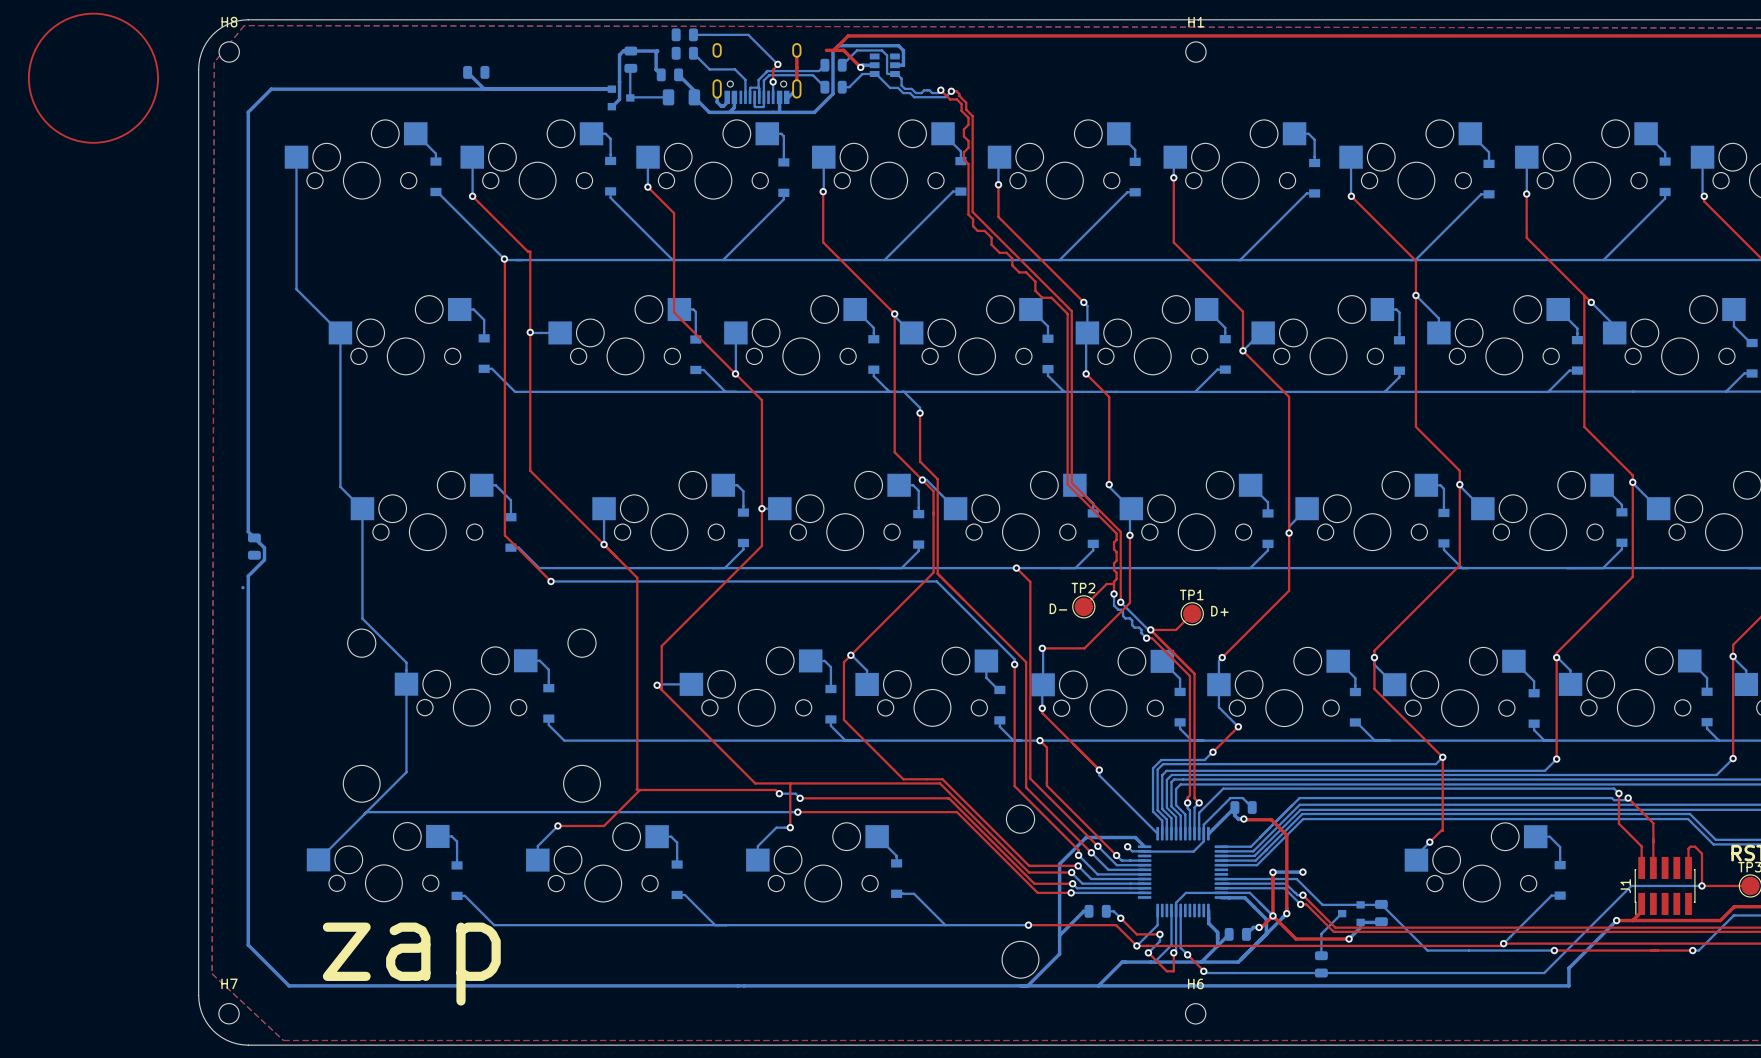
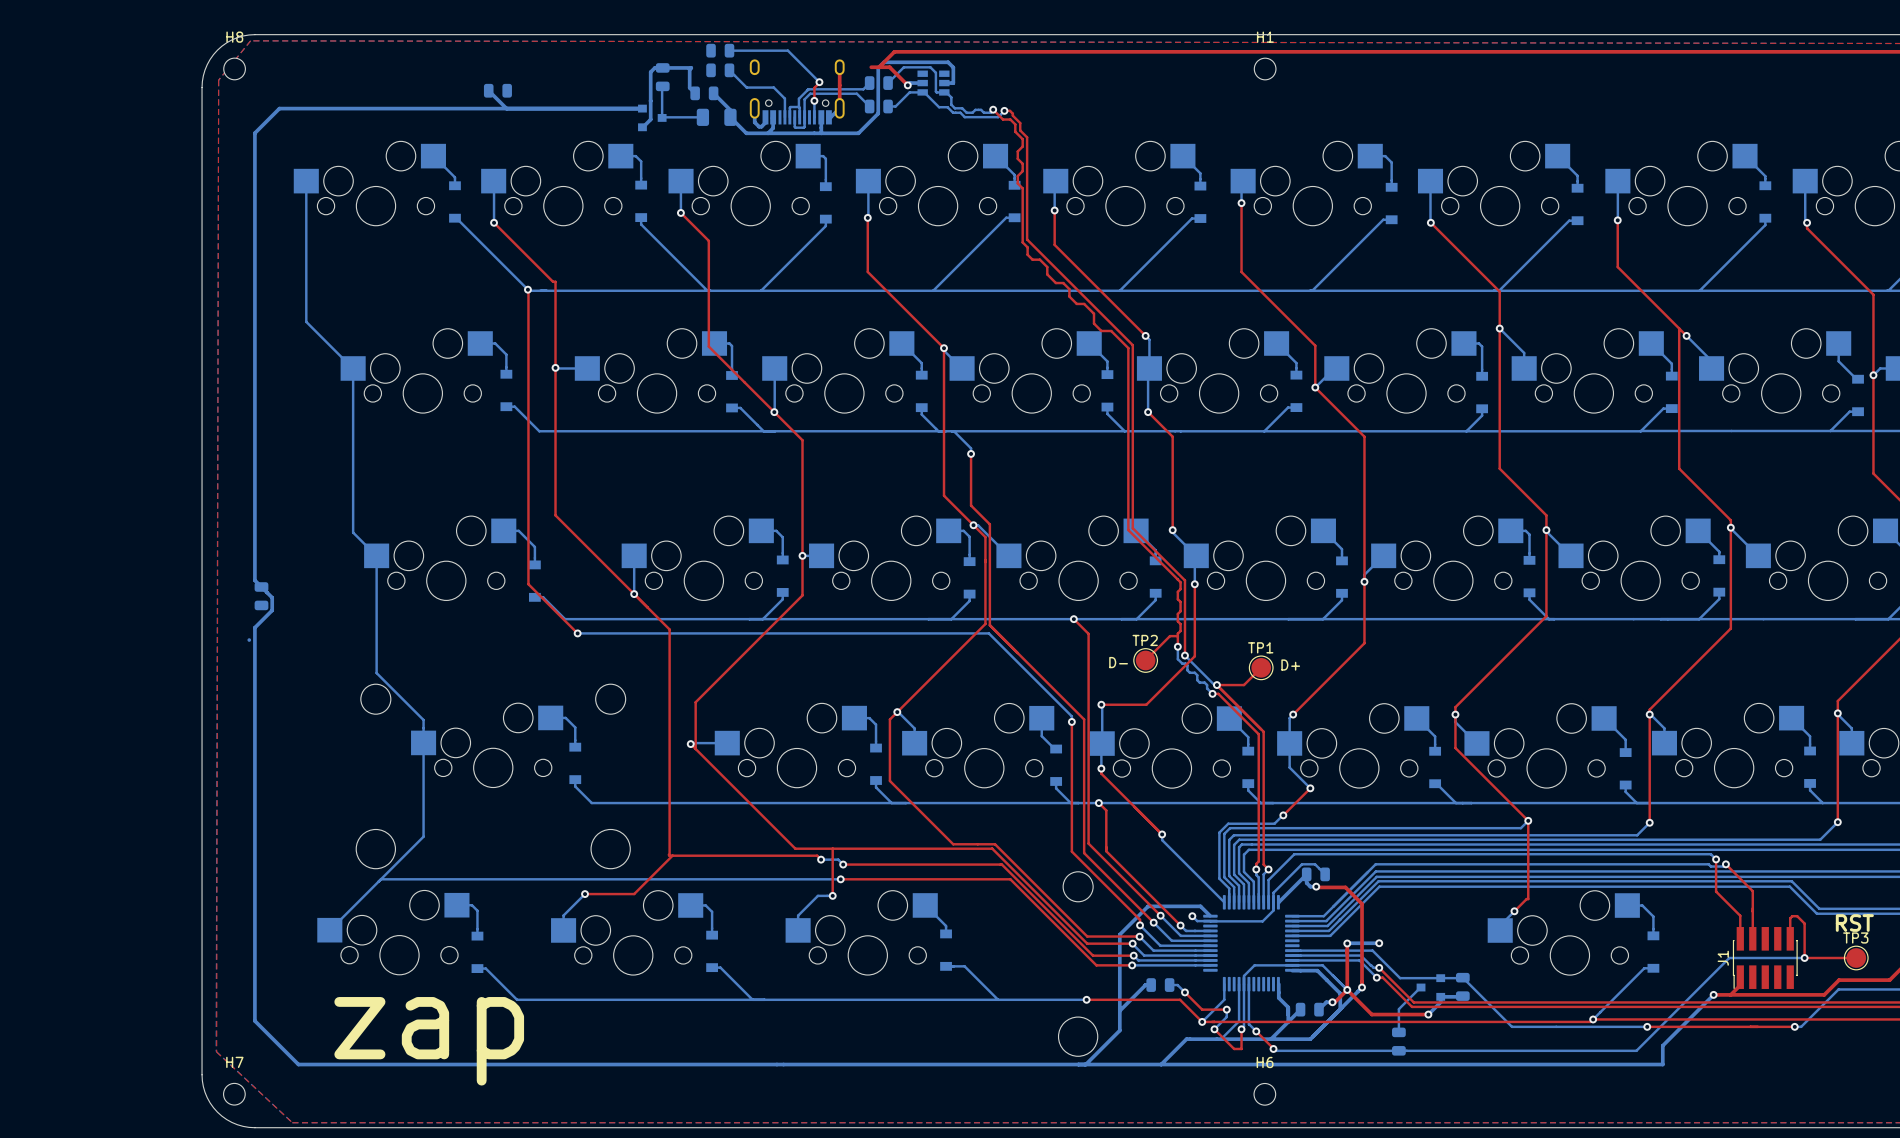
drawing: [27, 12, 159, 144] -> none

